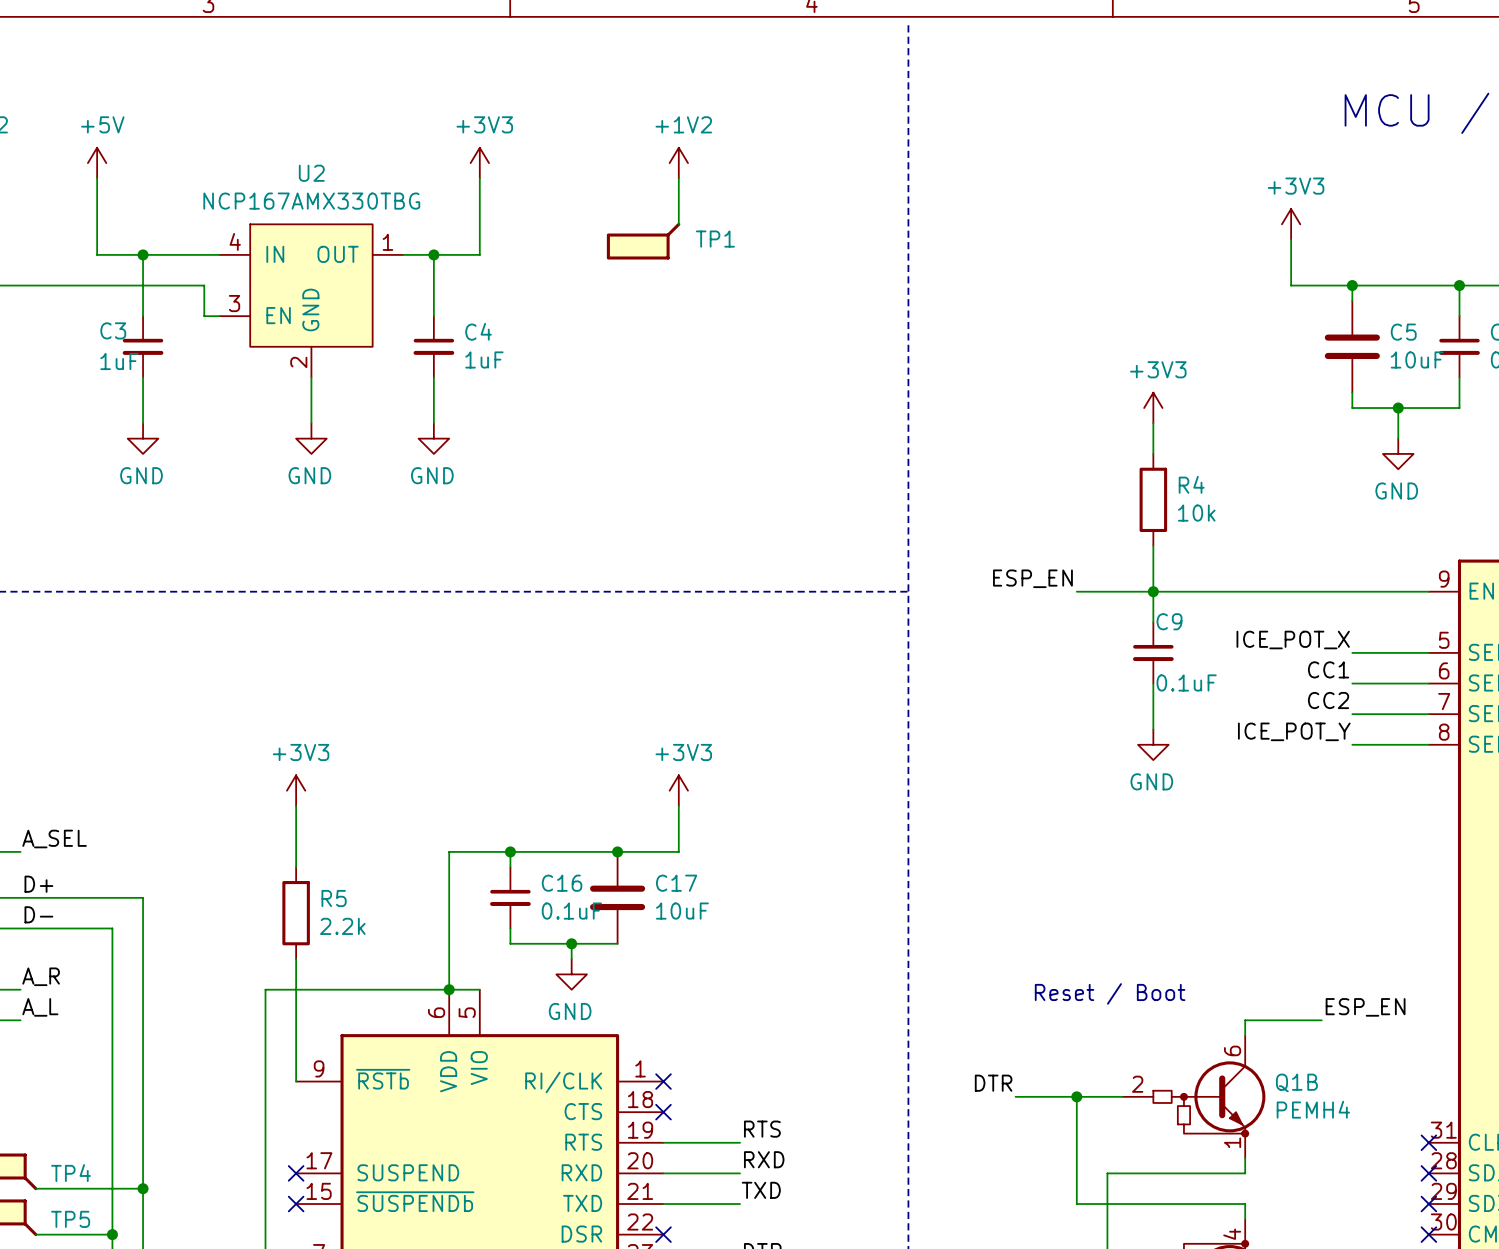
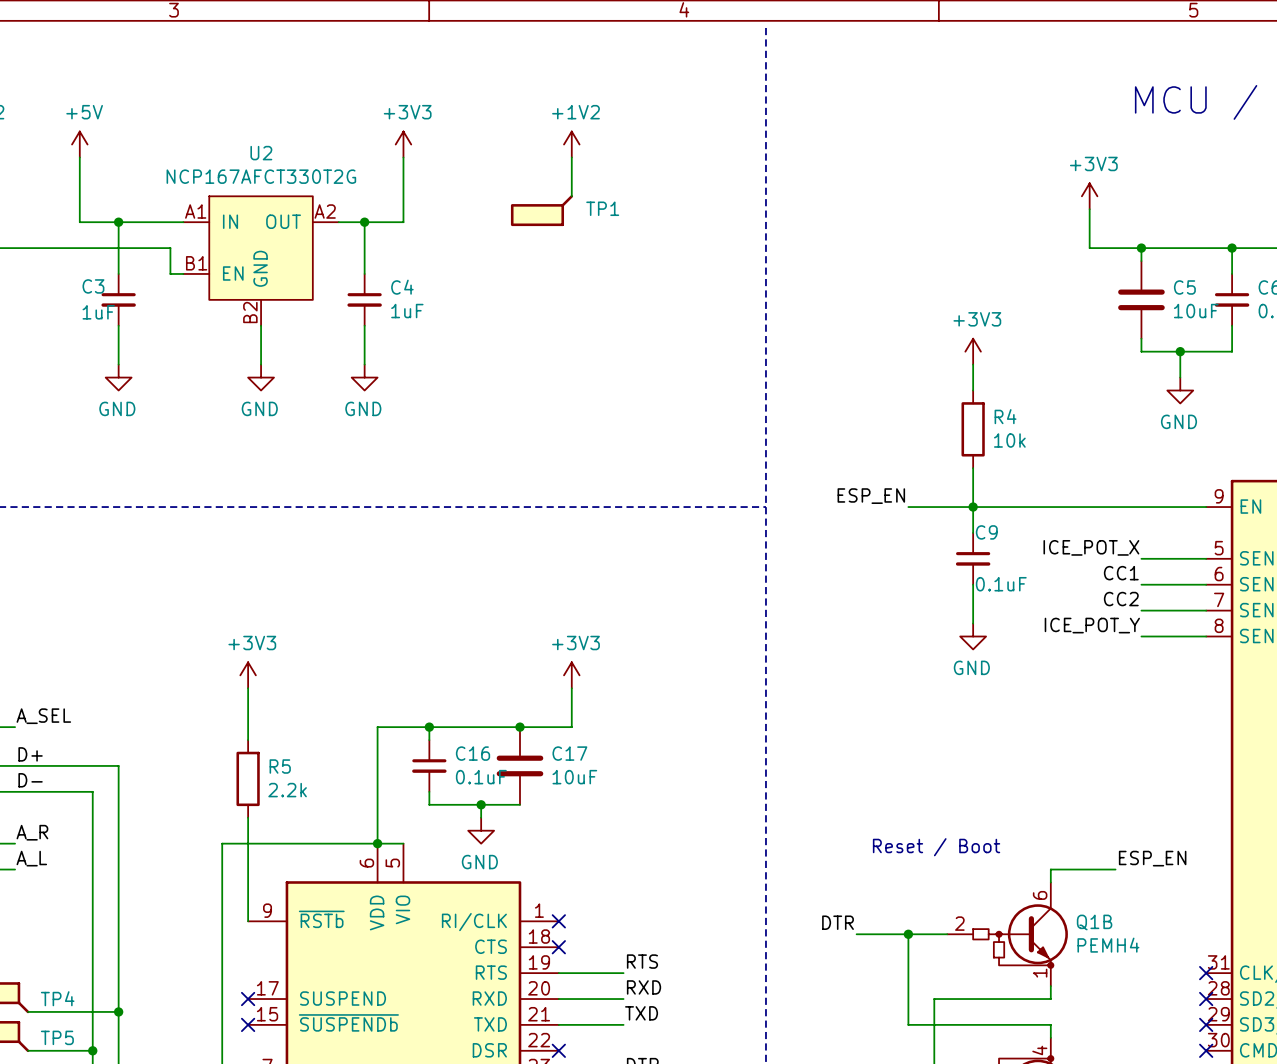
U2 value: NCP167AMX330TBG (311, 201) -> NCP167AFCT330T2G (261, 176)
U2 pin number: 4 (235, 241) -> A1 (195, 211)
U2 pin number: 1 (387, 242) -> A2 (325, 211)
U2 pin number: 3 (234, 303) -> B1 (196, 263)
U2 pin number: 2 (298, 362) -> B2 (250, 312)

